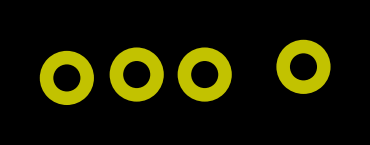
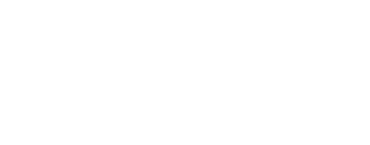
part: (303, 66) -> none
part: (136, 74) -> none
part: (204, 74) -> none
part: (66, 77) -> none

